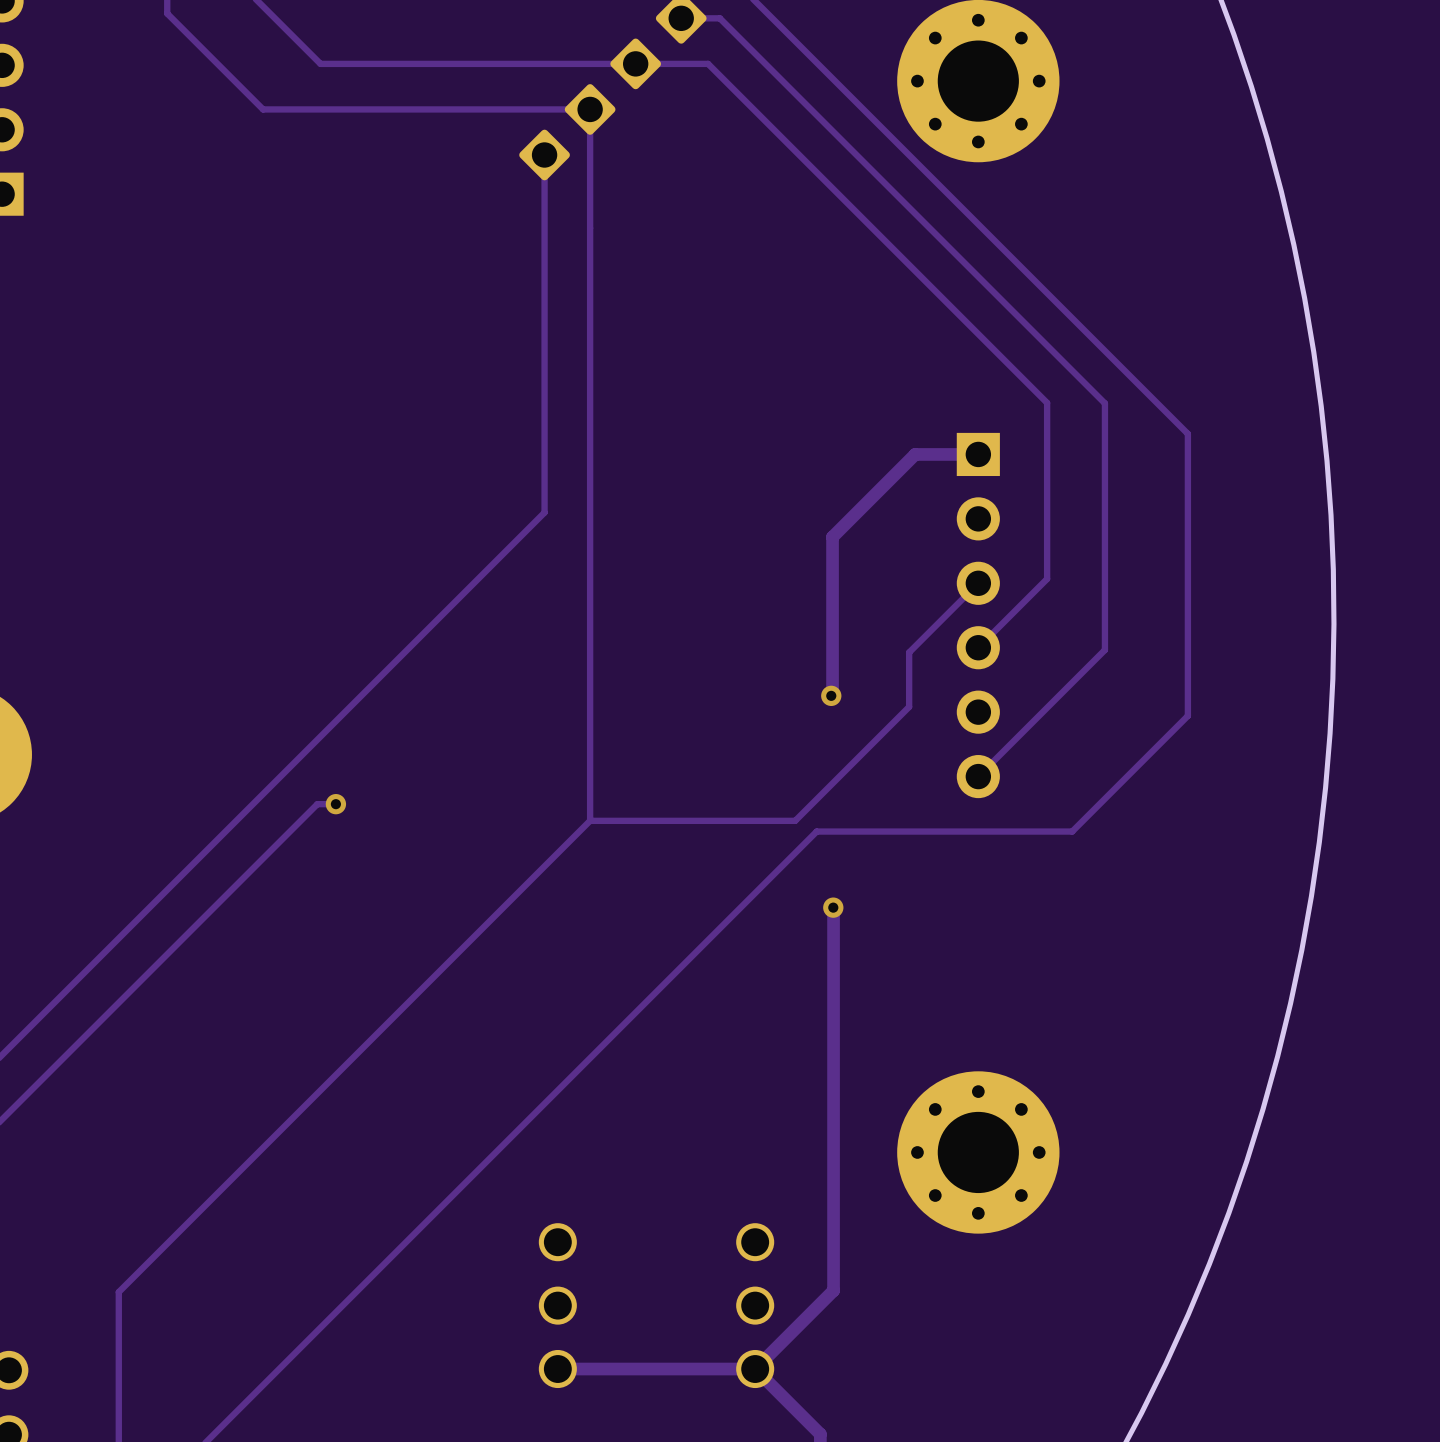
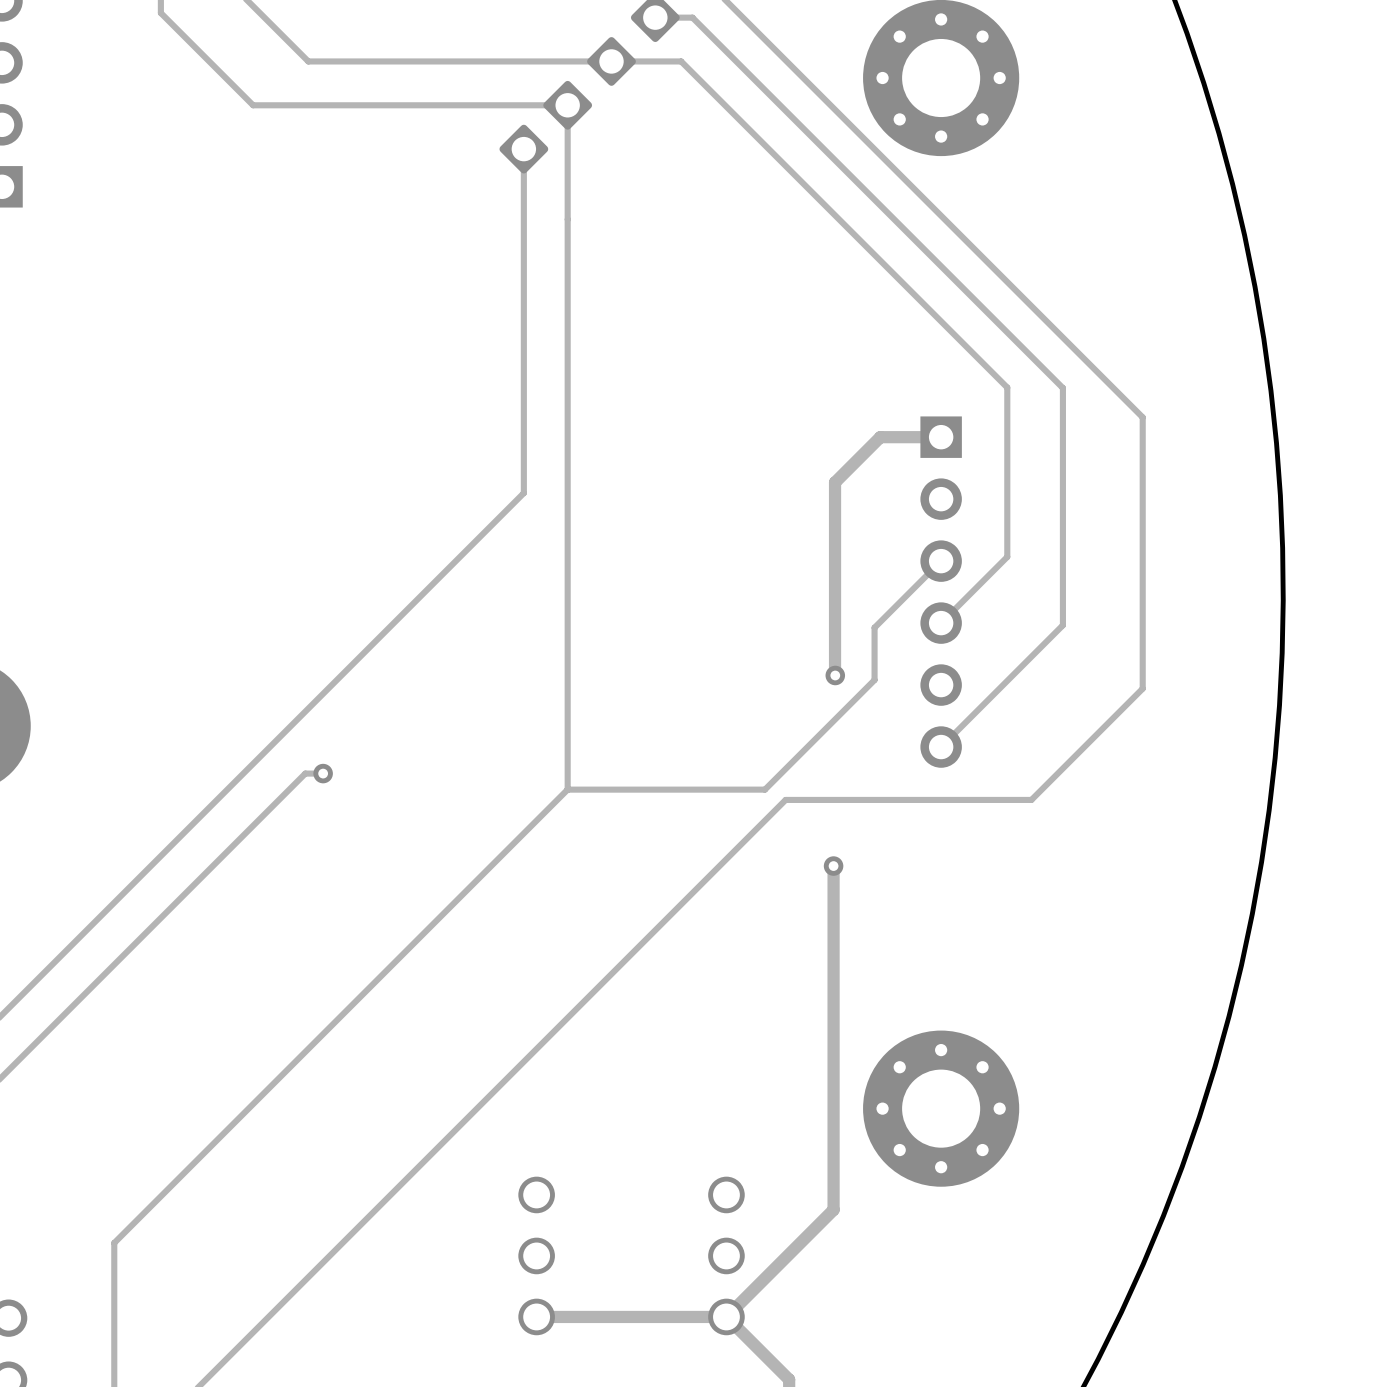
track: (868, 501) (832, 537) (831, 695) -> (835, 482) (835, 675)
via position: (831, 695) -> (835, 675)
track: (833, 907) (833, 1290) -> (833, 866) (833, 1209) (801, 1241)
via position: (833, 907) -> (833, 866)

